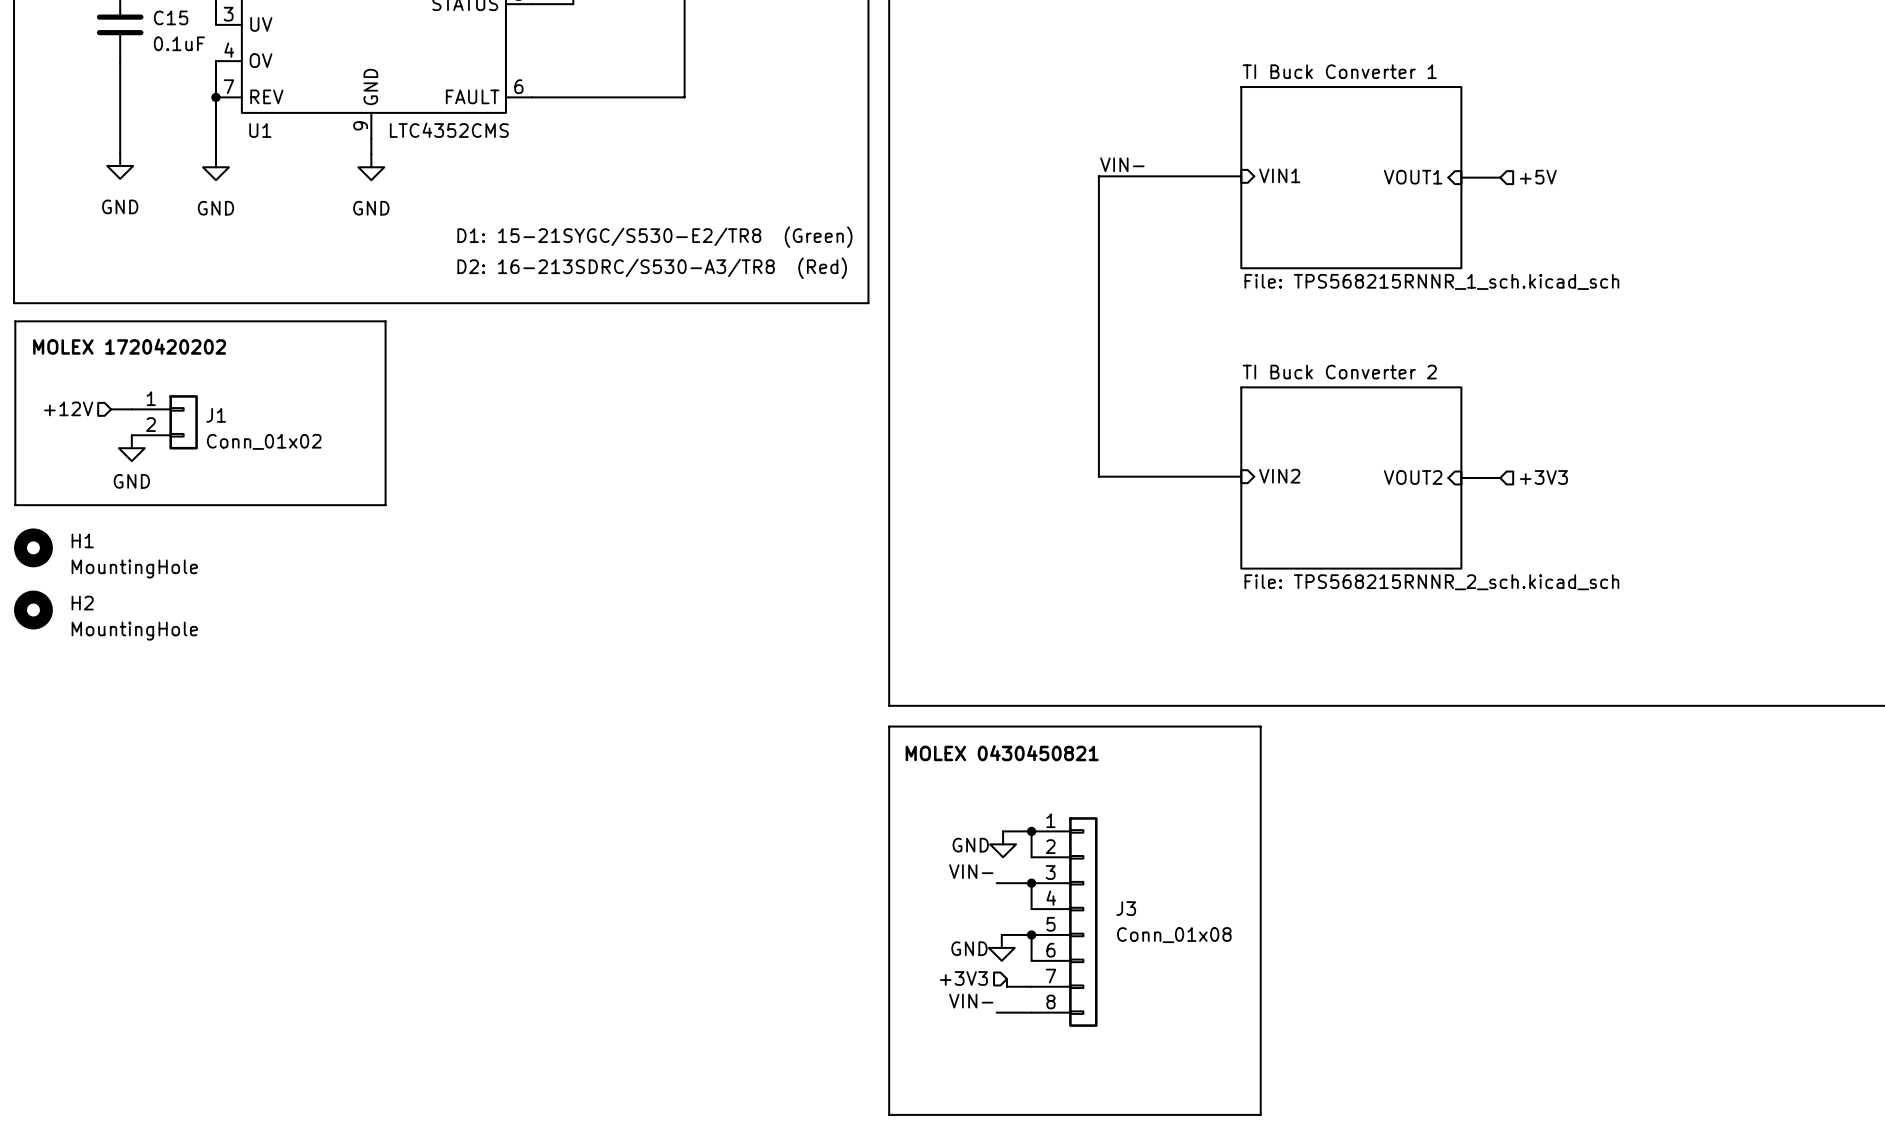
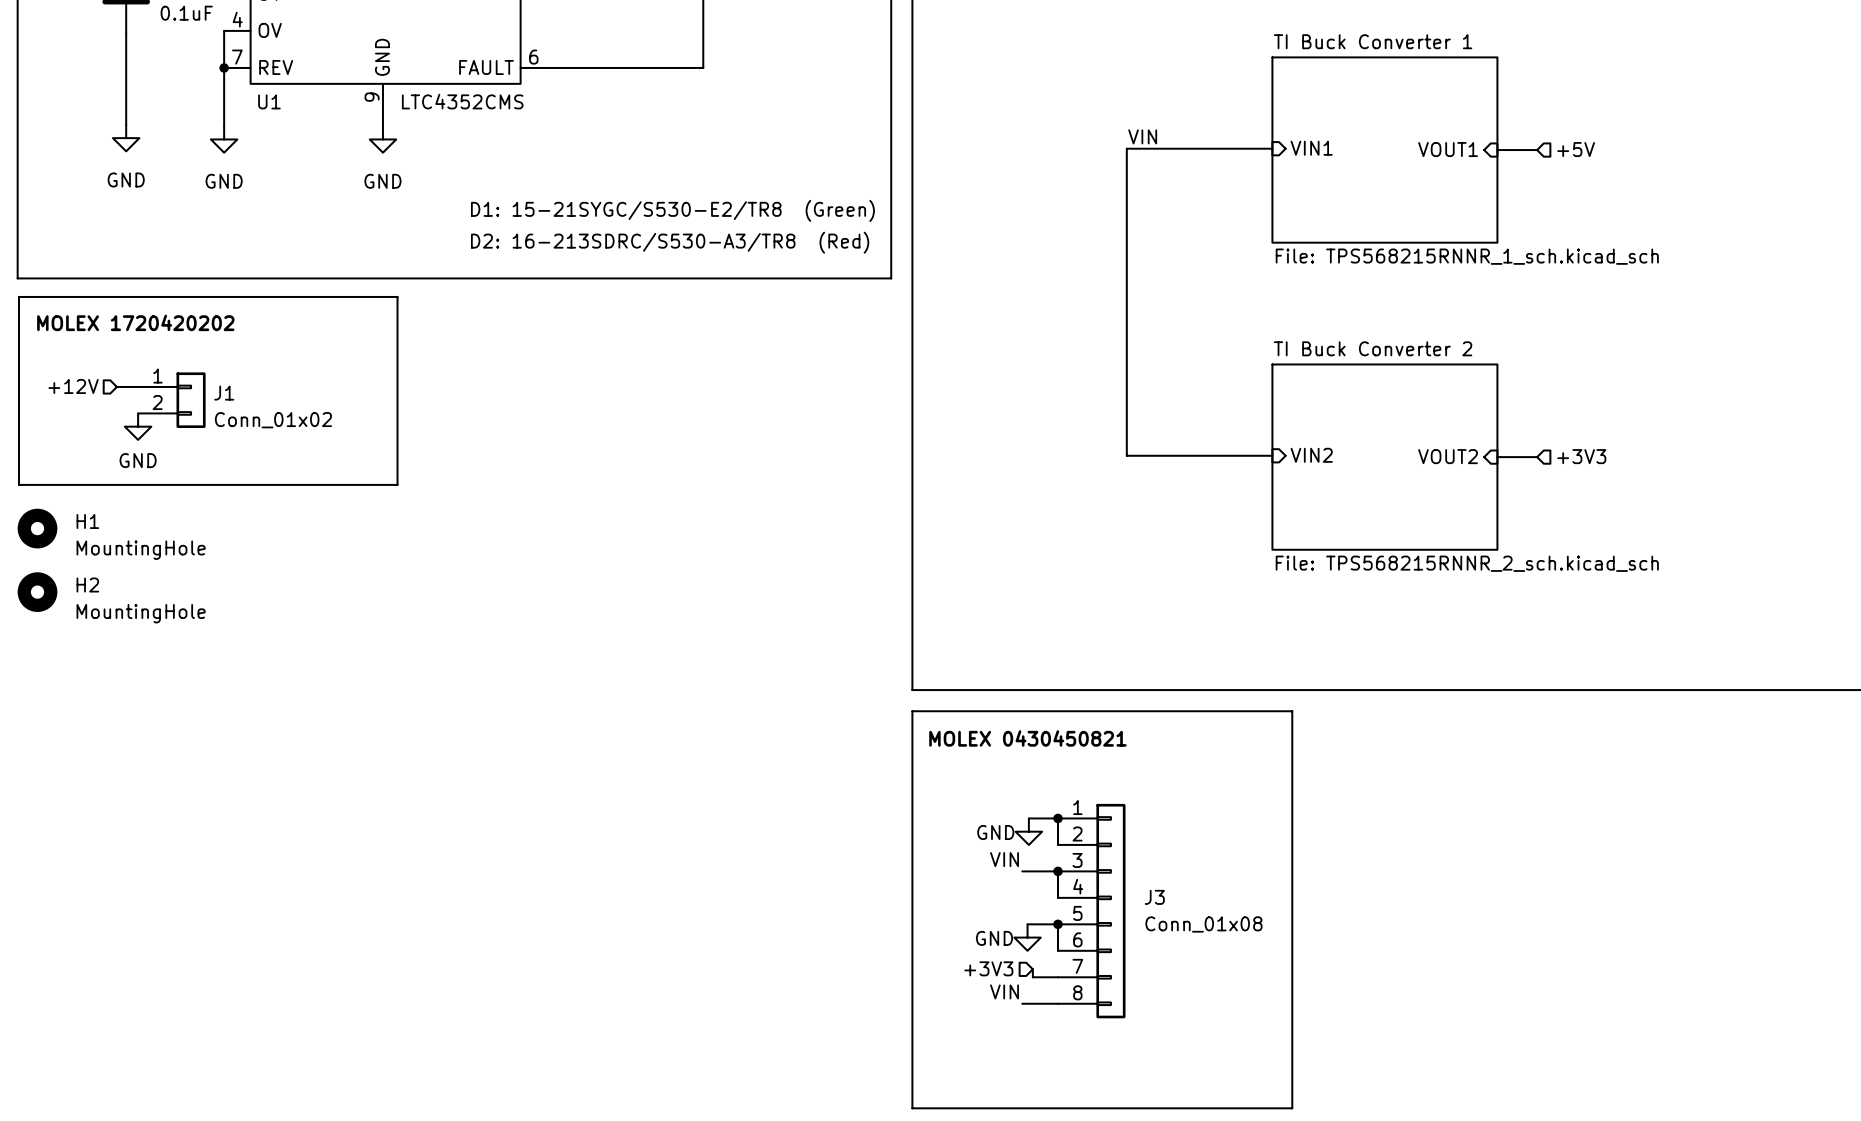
label: VIN- (1122, 164) -> VIN (1142, 136)
label: VIN- (971, 871) -> VIN (1004, 859)
label: VIN- (971, 1001) -> VIN (1004, 991)

